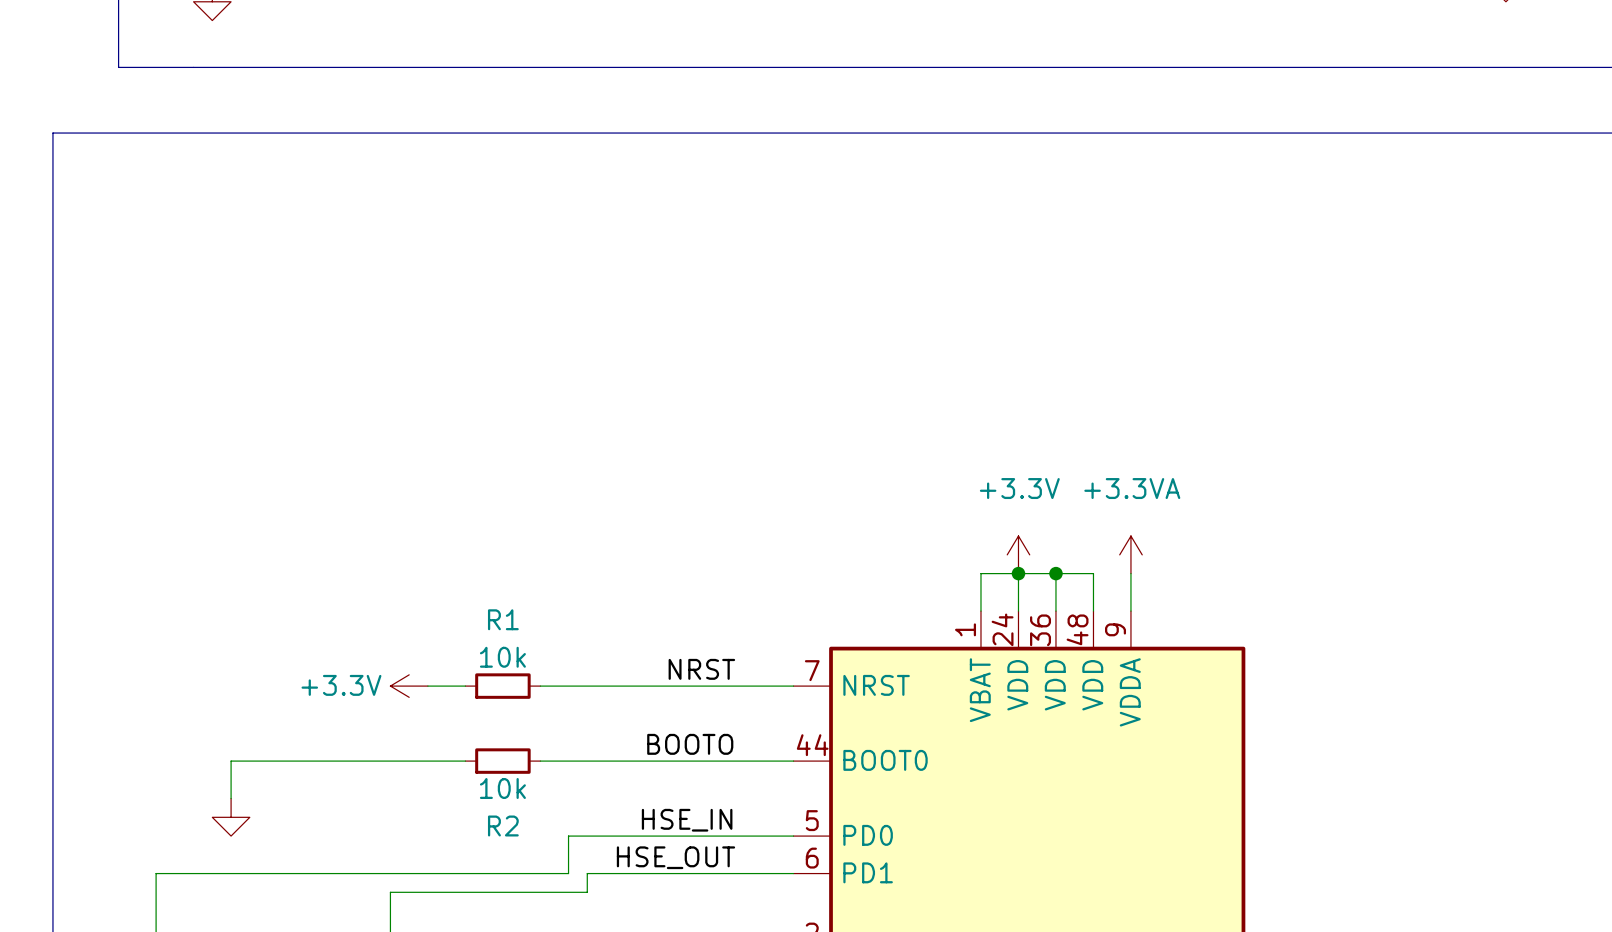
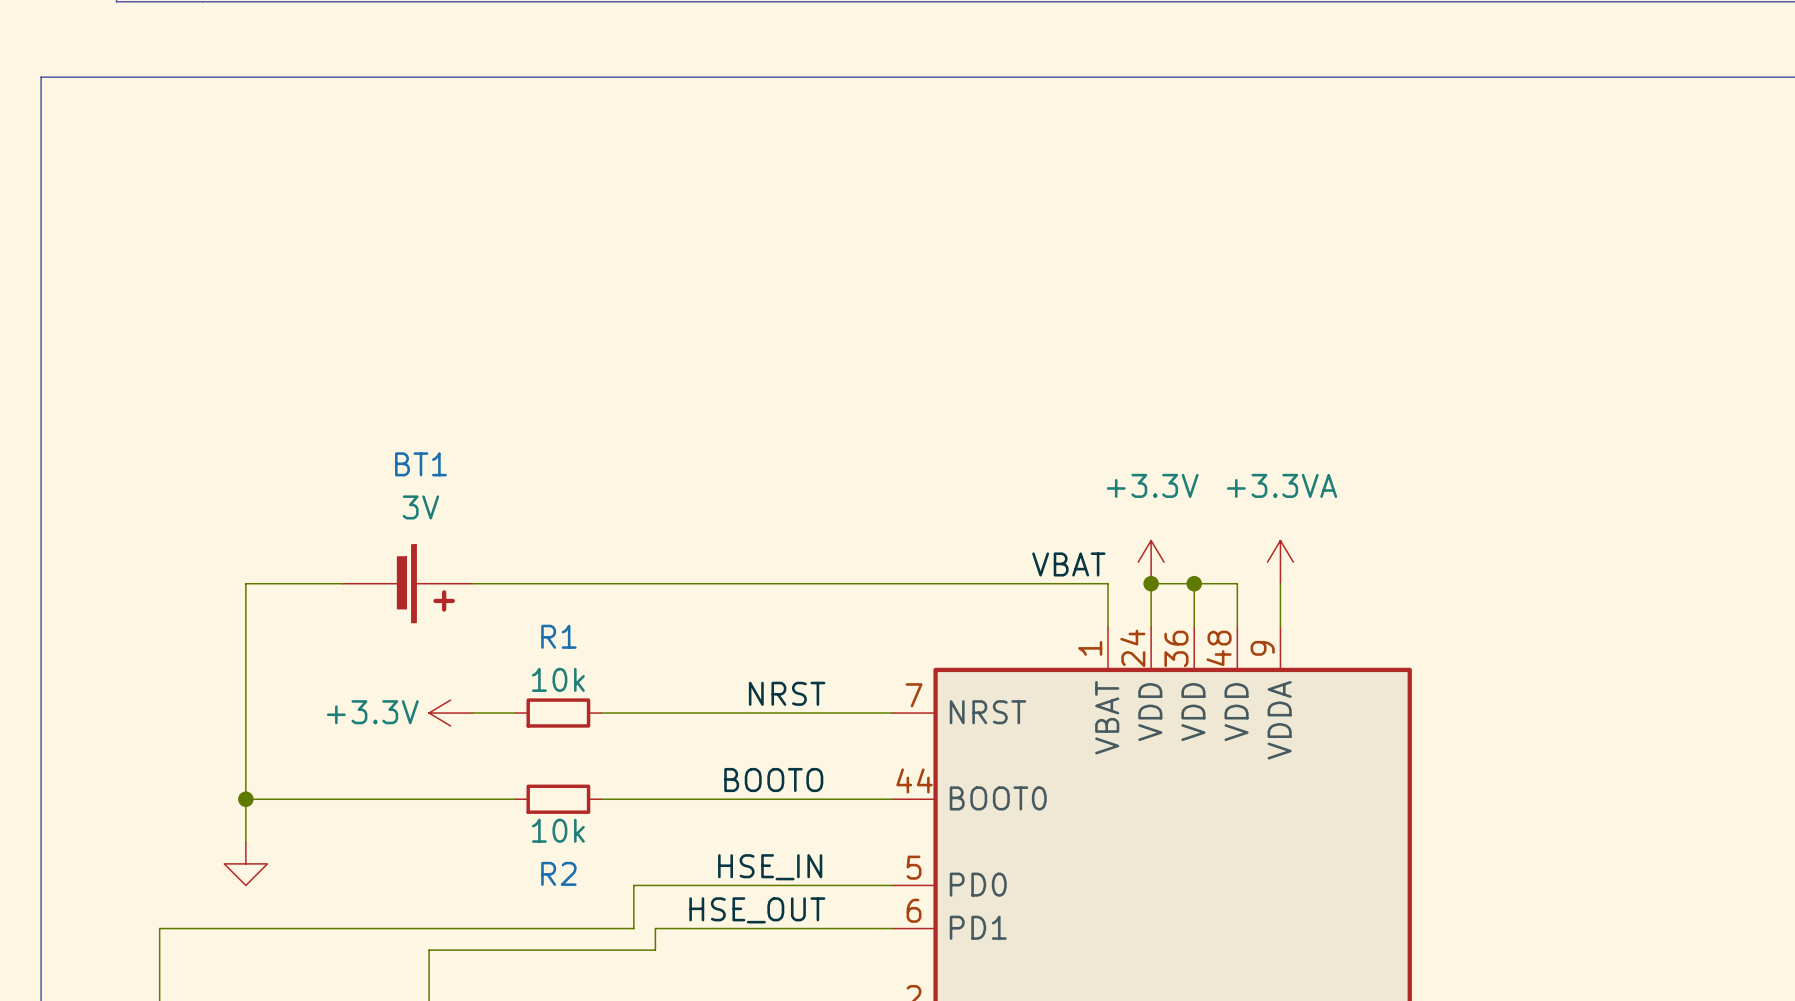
label: none -> VBAT (1068, 564)
wire: none -> (342, 583) (245, 583) (245, 799)
BT1: none -> 3V (407, 583)
wire: (980, 573) (1018, 573) -> (1108, 583) (472, 583)
junction: none -> (245, 799)

